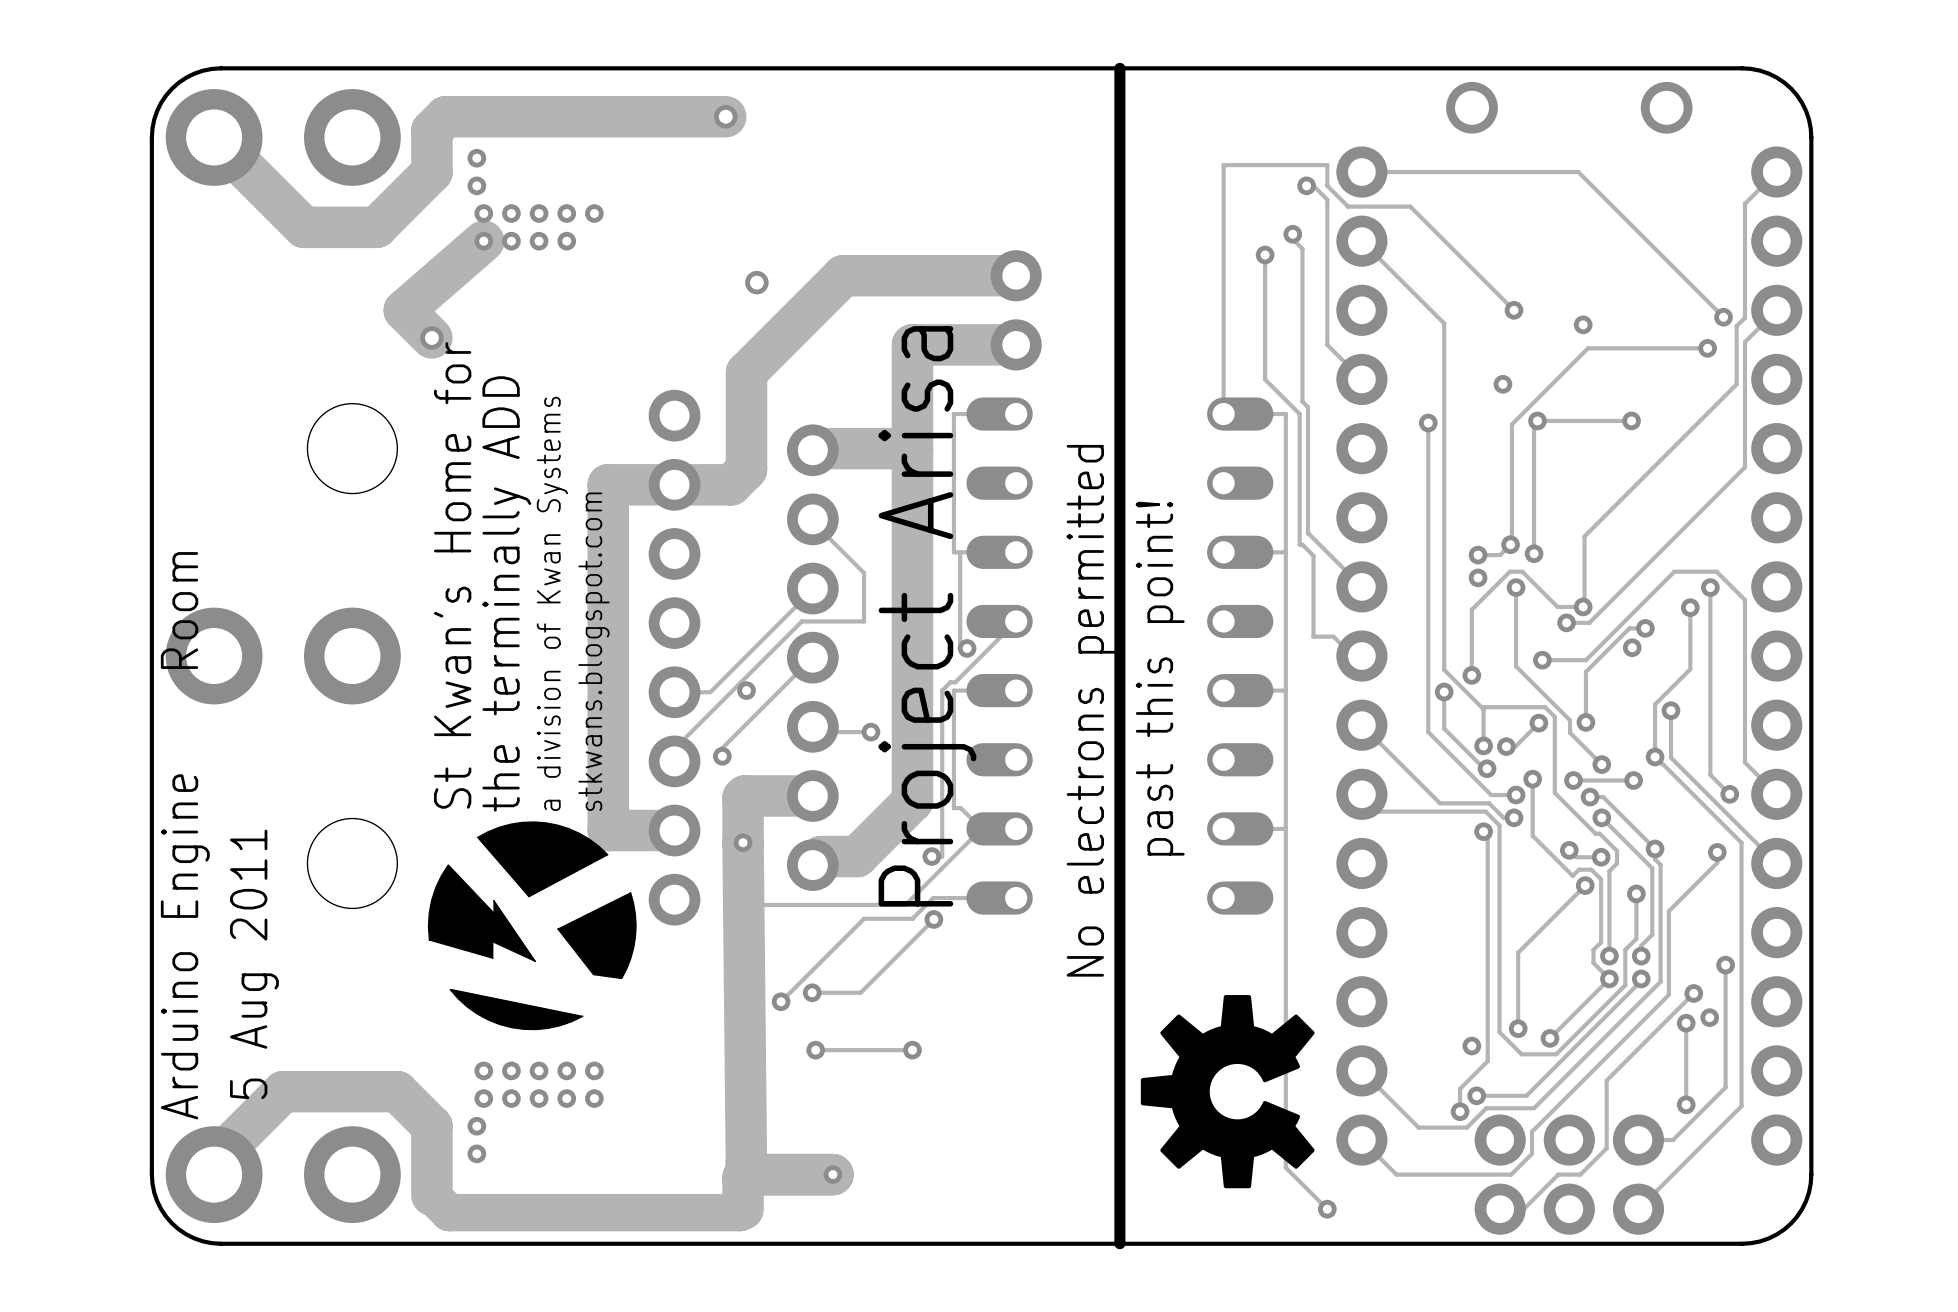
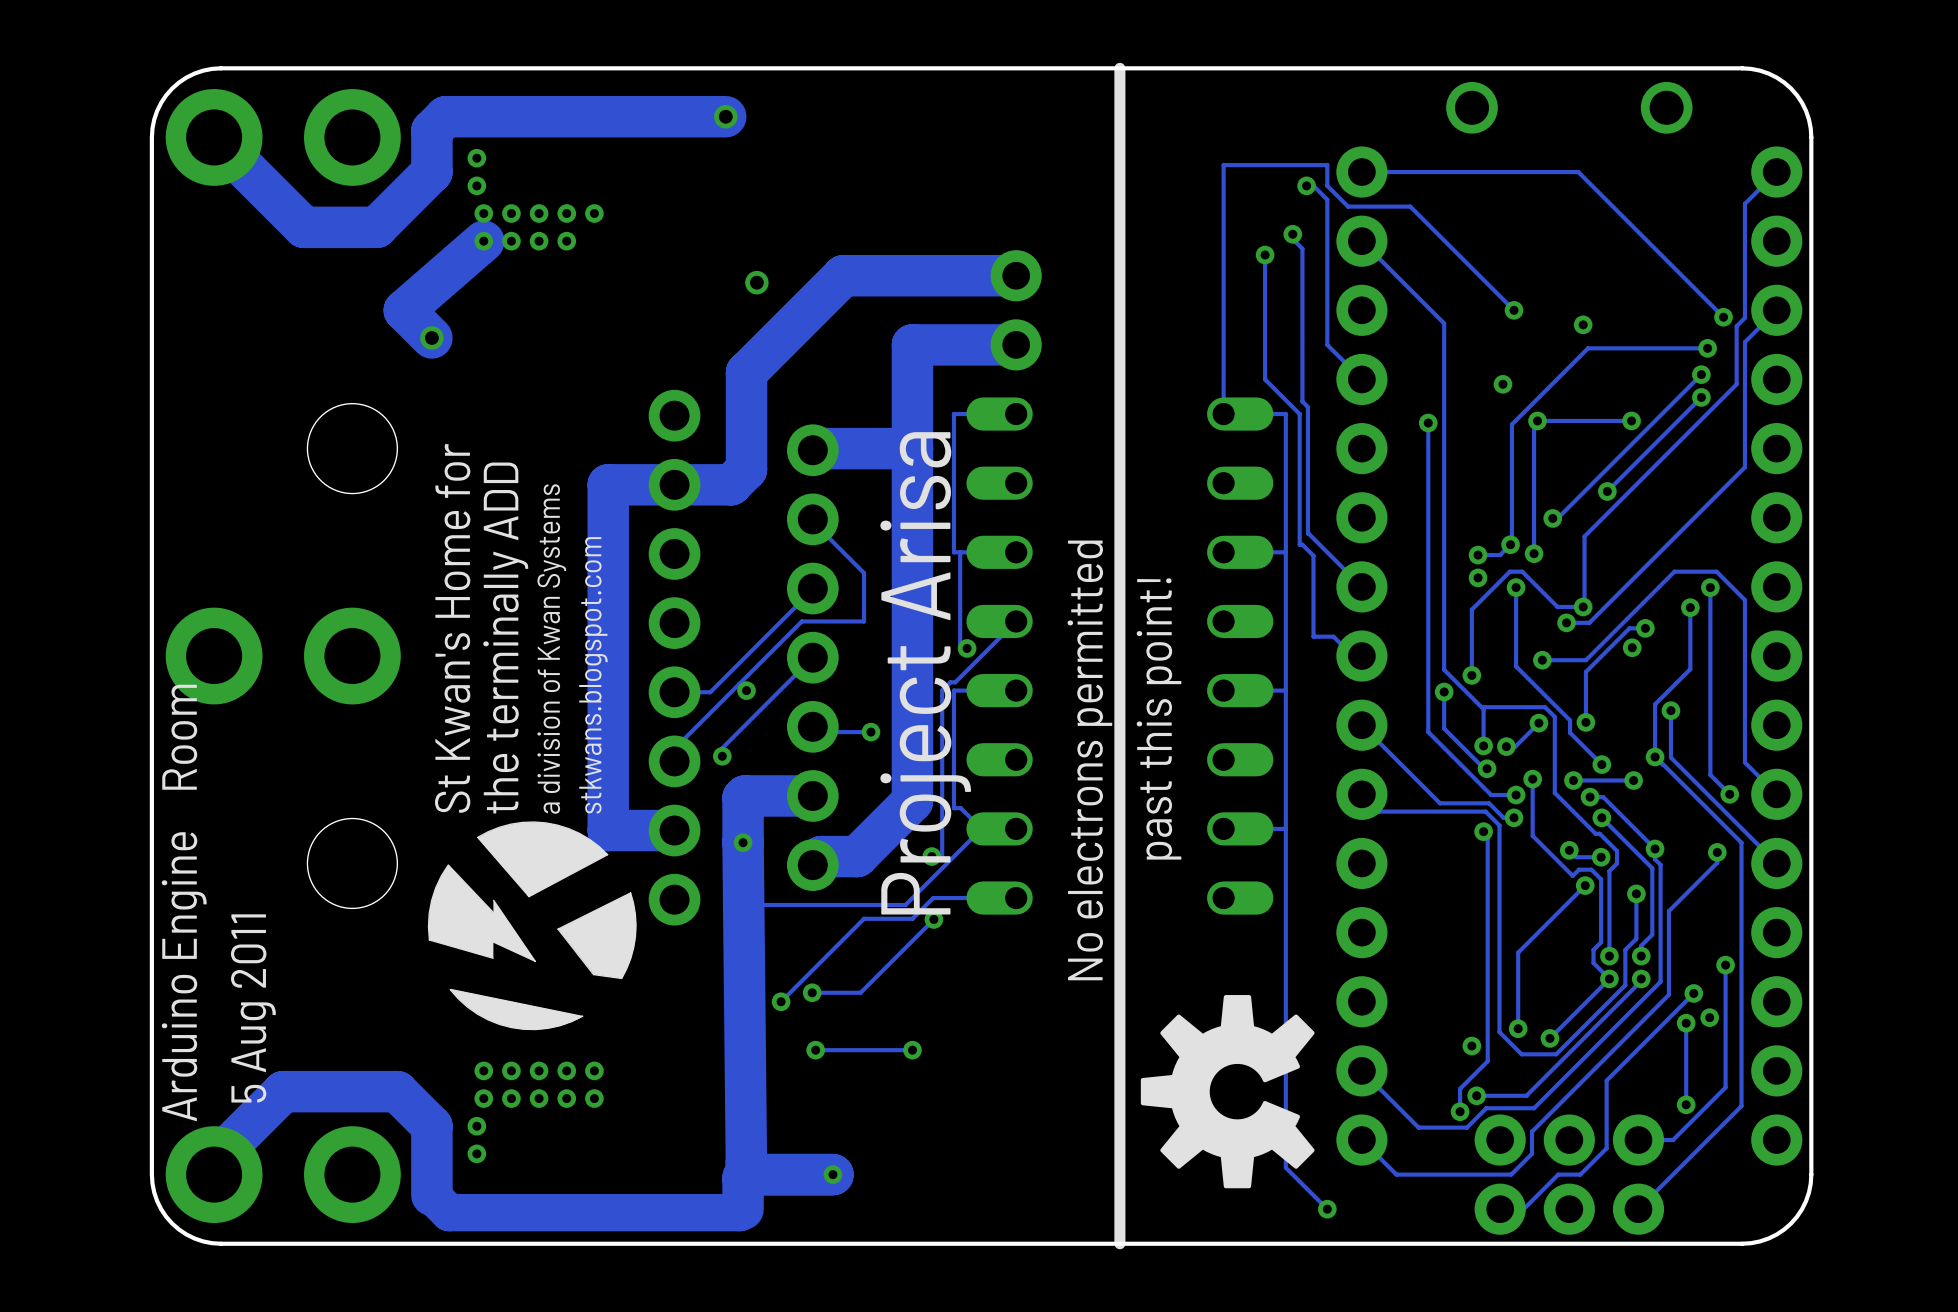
track: none -> (1701, 374) (1557, 518) (1552, 518)
via: none -> (1701, 374)
track: none -> (1701, 397) (1607, 491)
via: none -> (1701, 397)
via: none -> (1607, 491)
via: none -> (1552, 518)

